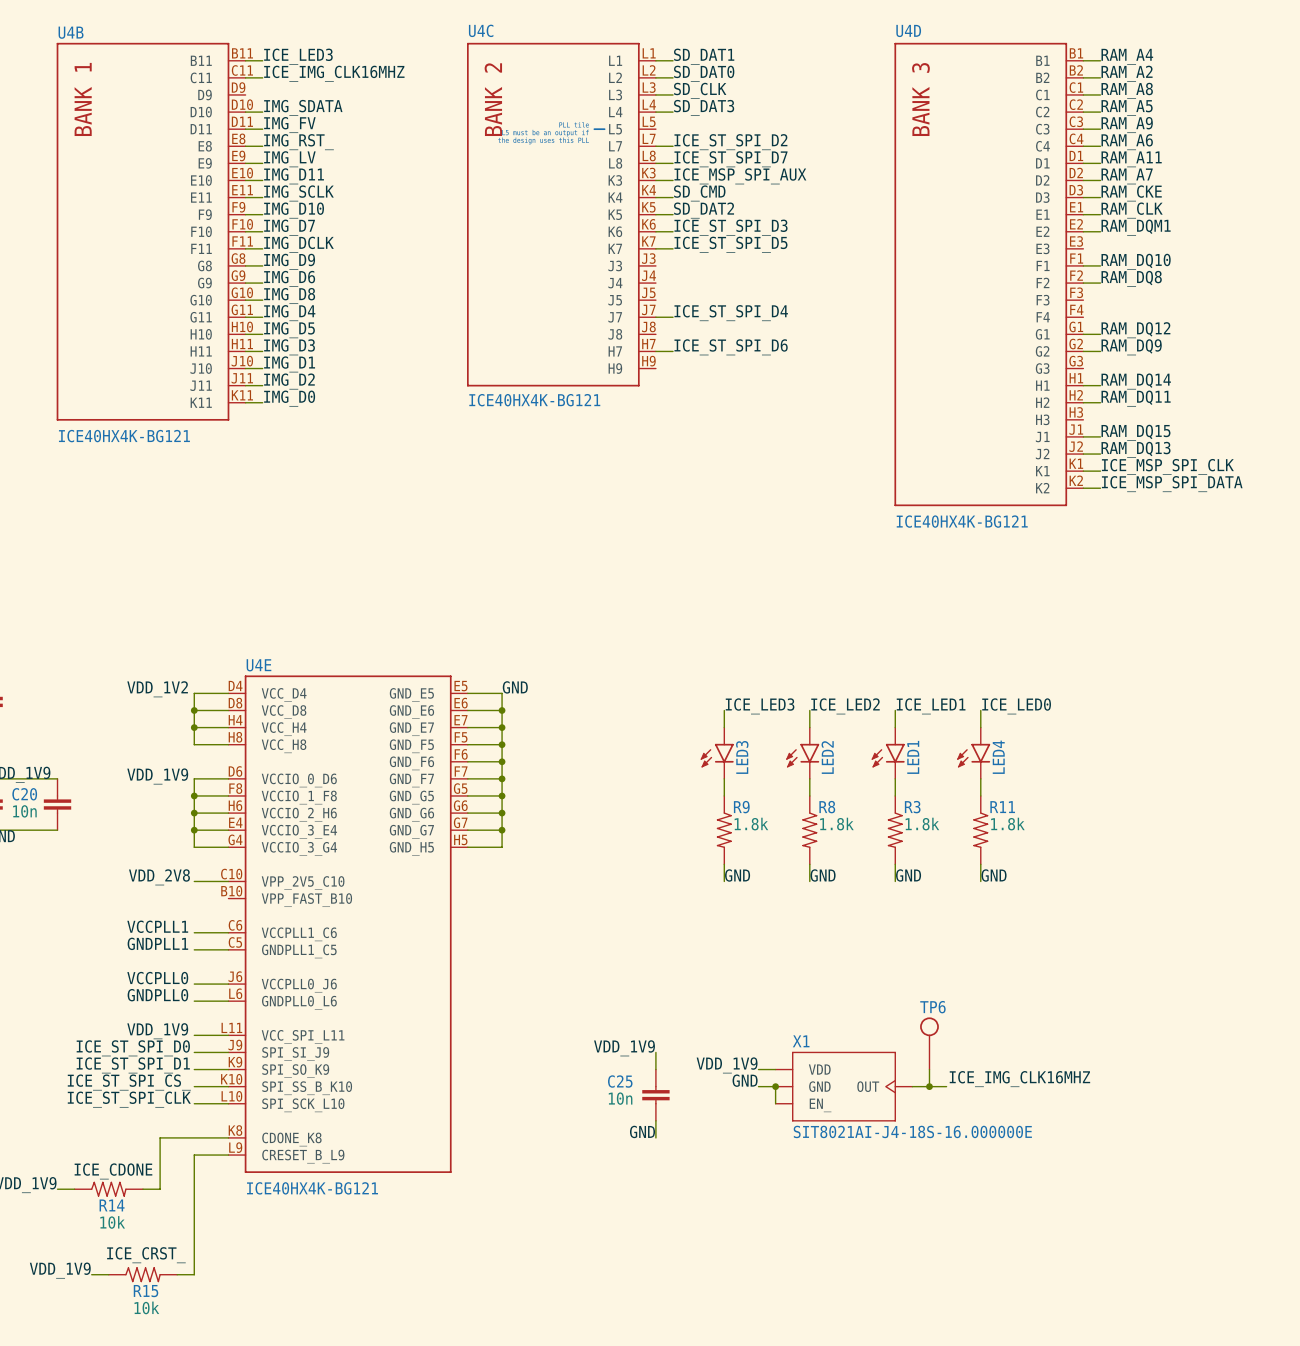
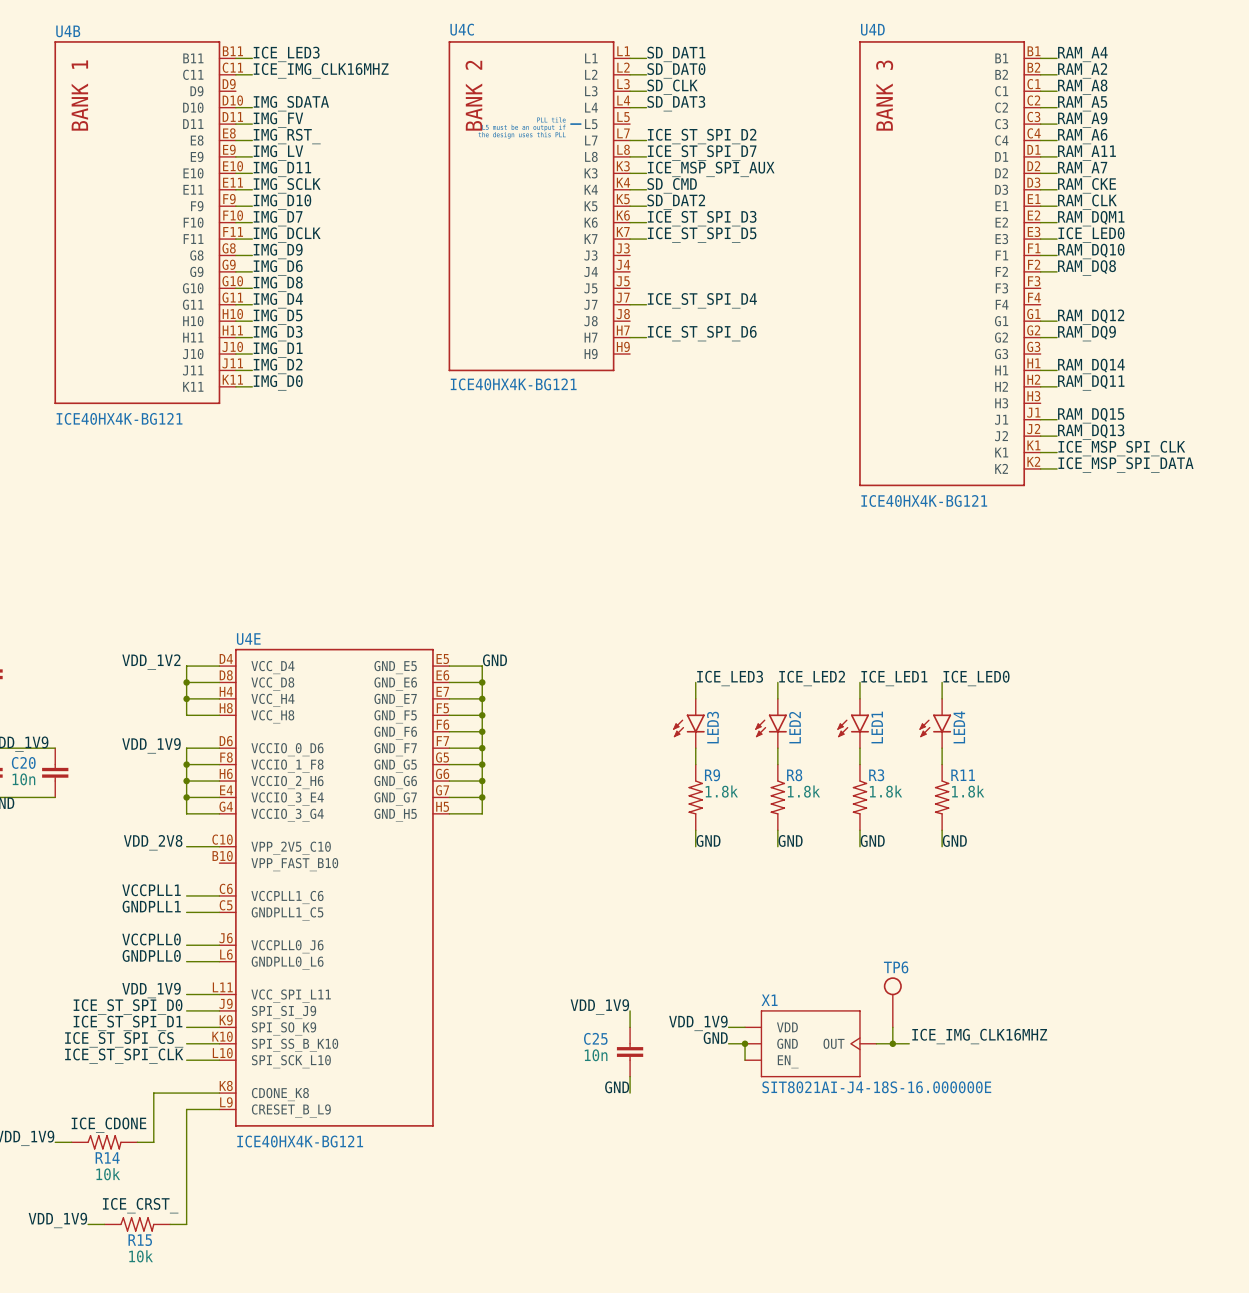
label: none -> ICE_LED0 (1091, 235)
wire: none -> (1040, 239) (1057, 239)

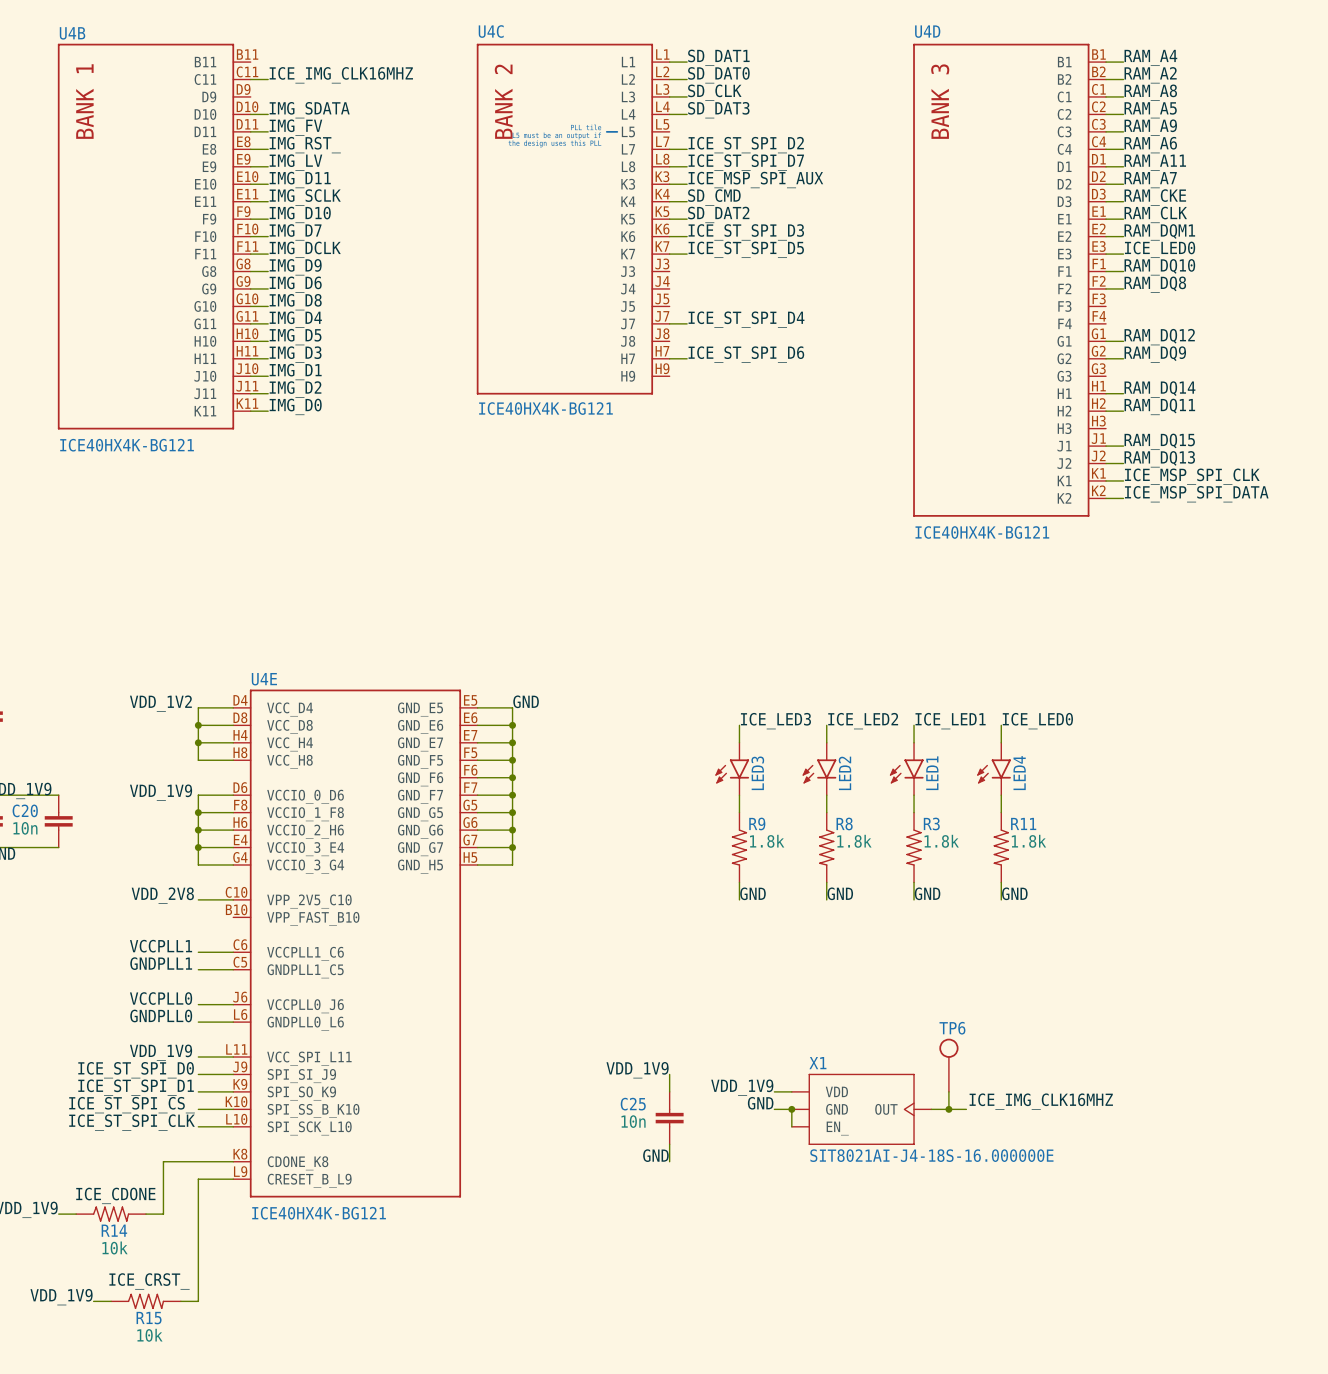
label: ICE_LED3 (286, 54) -> none
wire: (235, 58) (252, 58) -> none

